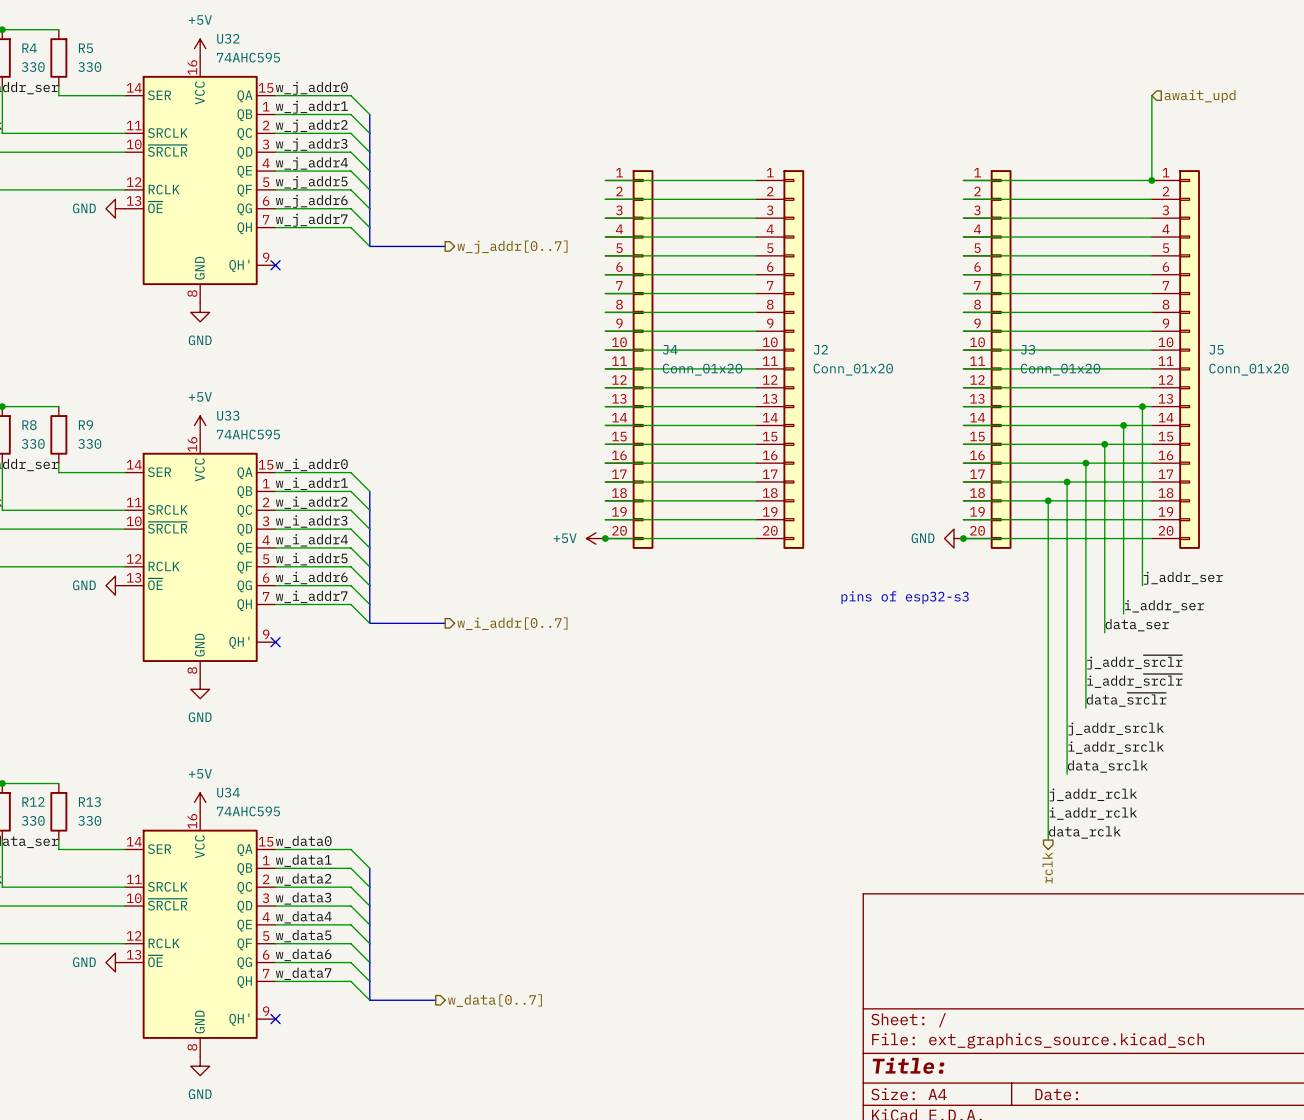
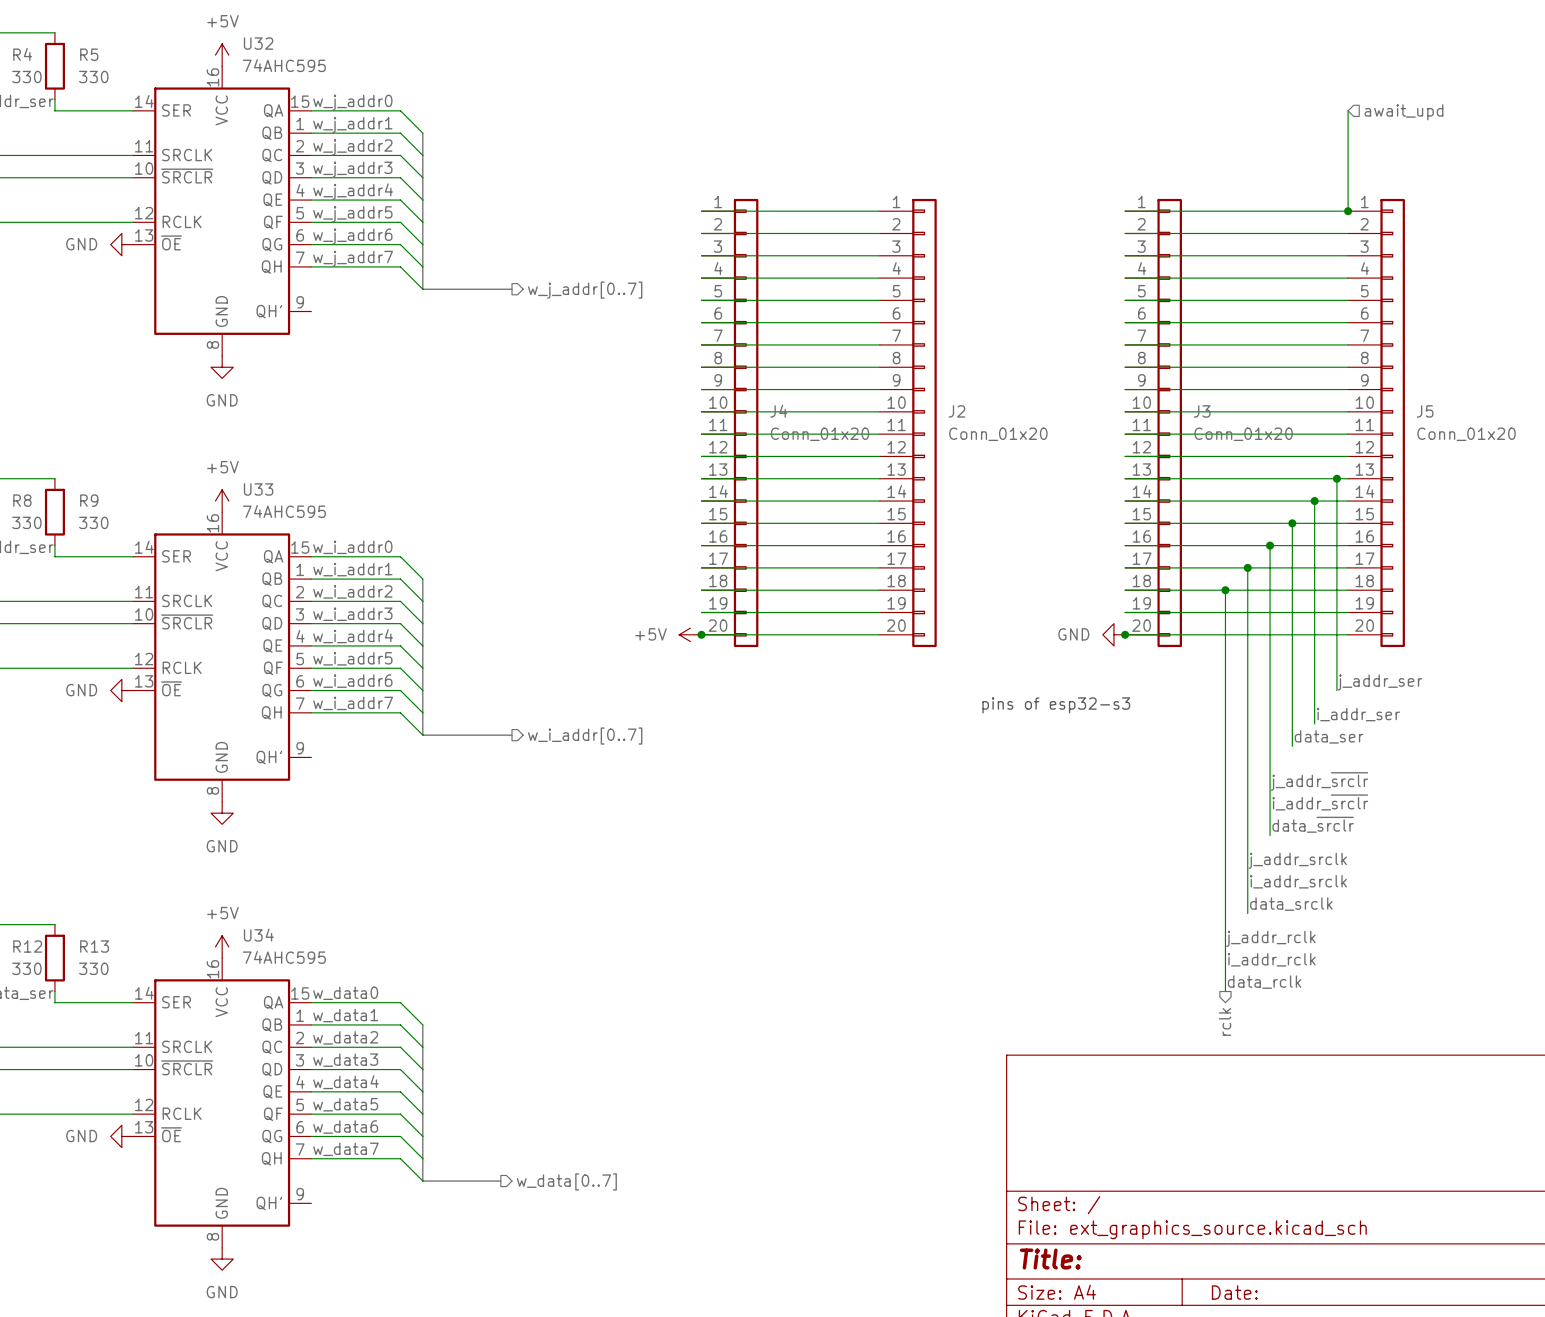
no-connect mark: (275, 265) -> none
no-connect mark: (275, 642) -> none
no-connect mark: (275, 1019) -> none

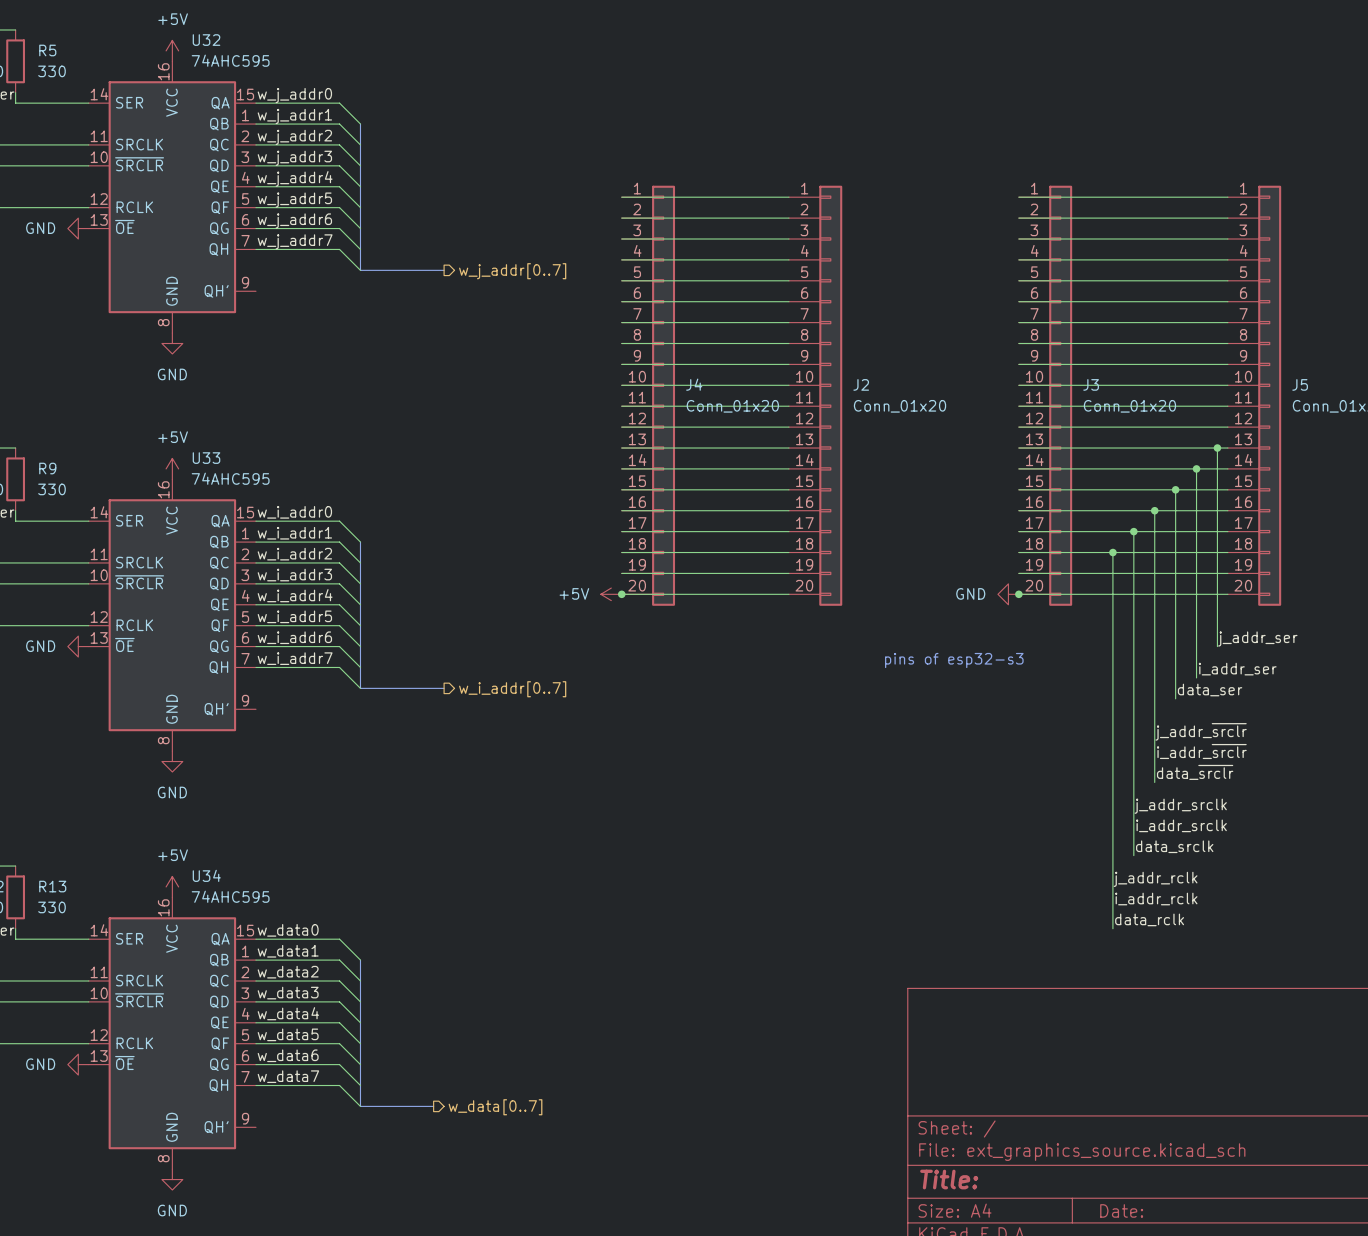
wire: (1348, 110) (1348, 211) -> none
hierarchical label: await_upd (1403, 112) -> none
junction: (1348, 211) -> none
hierarchical label: rclk (1225, 1021) -> none

